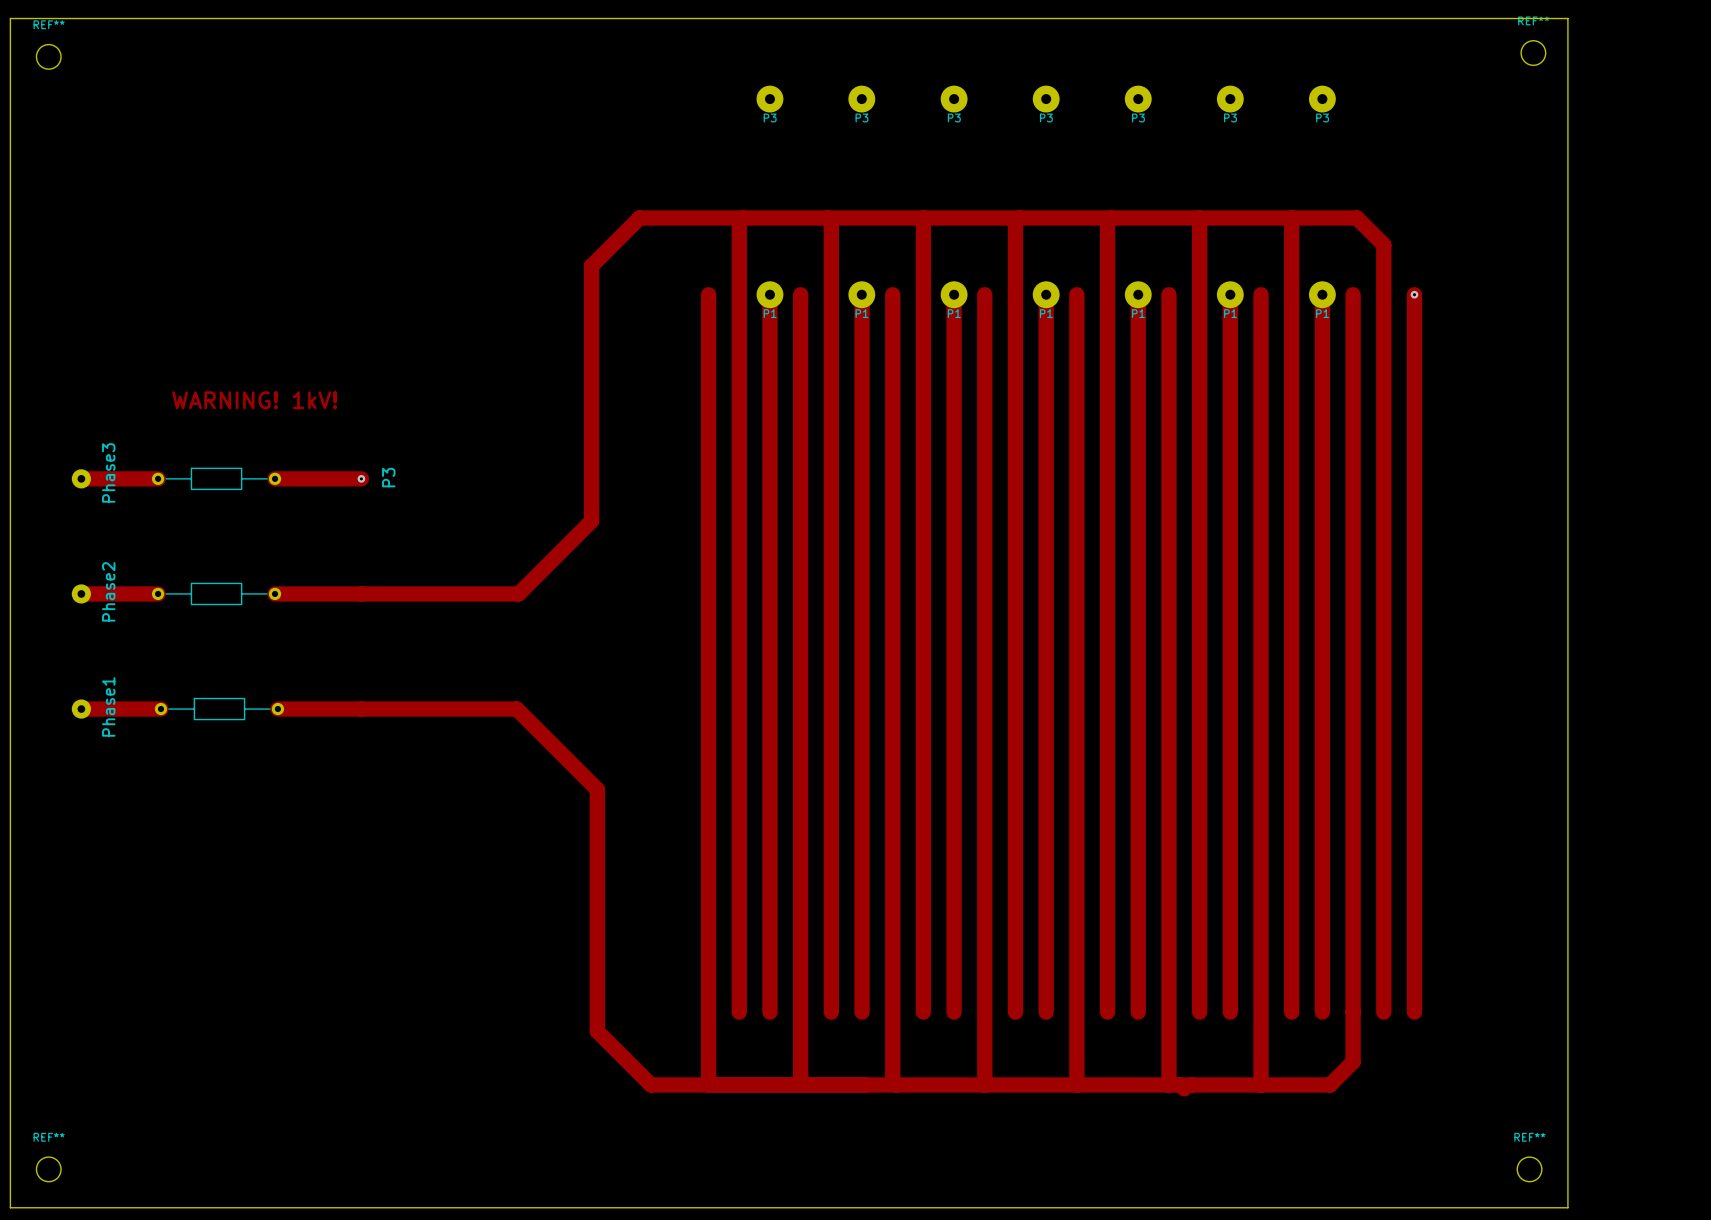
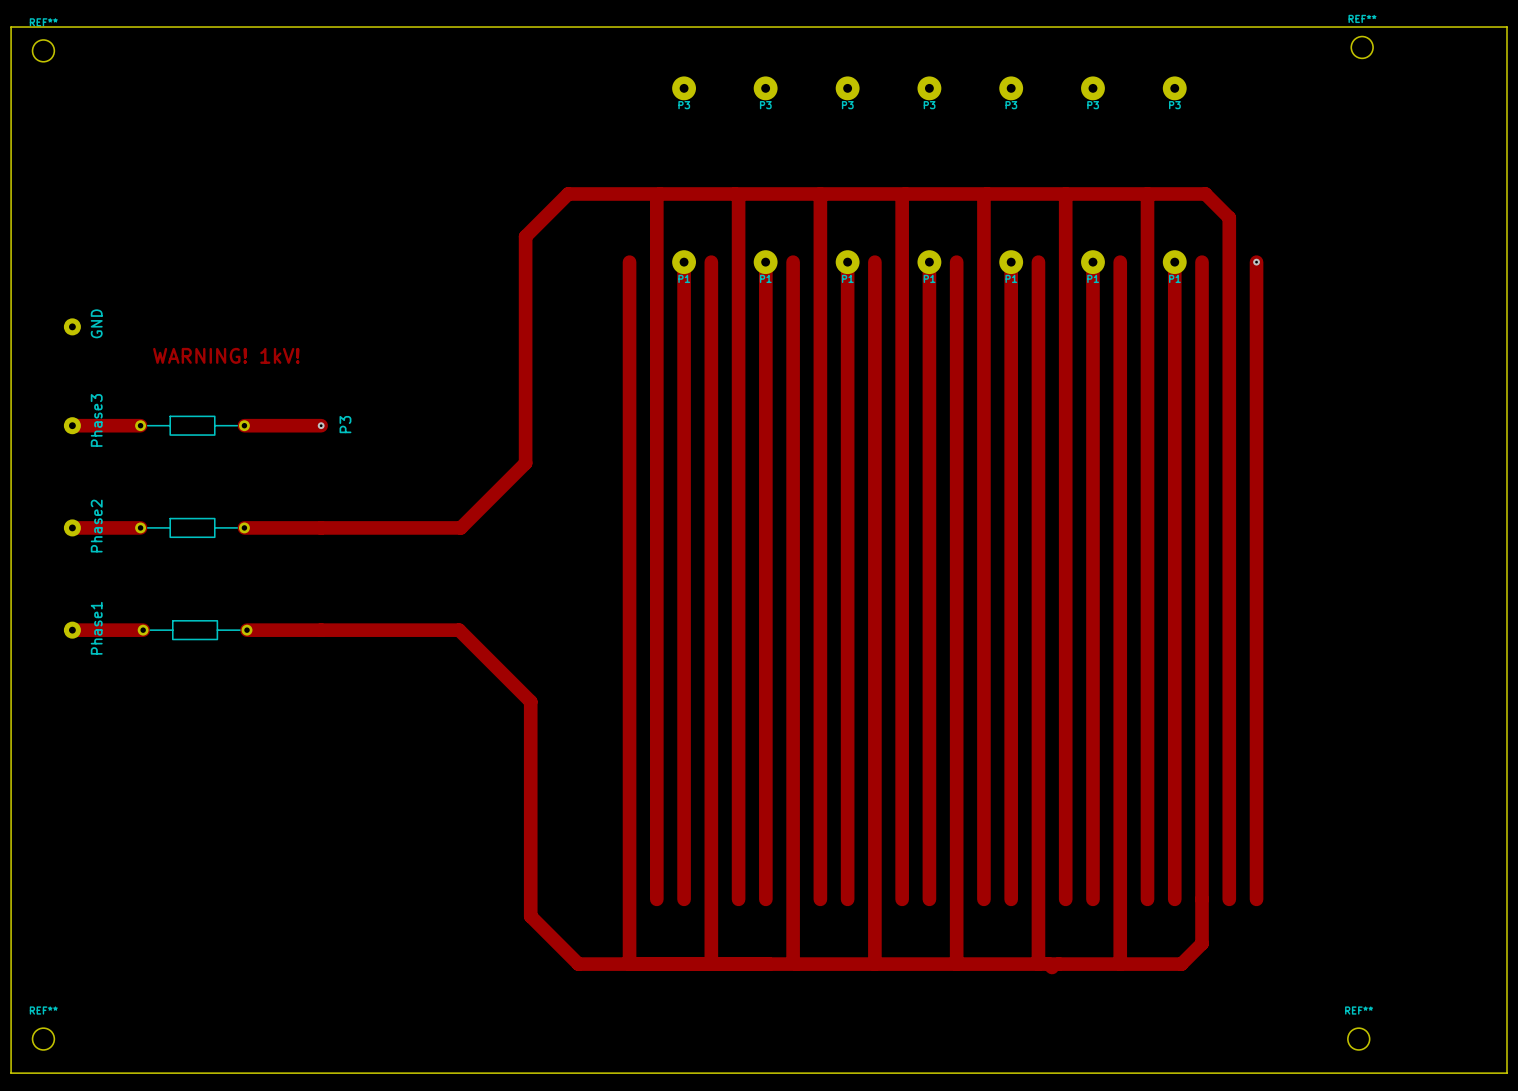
part: none -> (72, 326)
board edge: (12, 1207) (10, 1207) (10, 18) (1567, 18) (1567, 1207) -> (11, 1073) (11, 27) (1506, 27) (1506, 1073) (1392, 1073)

